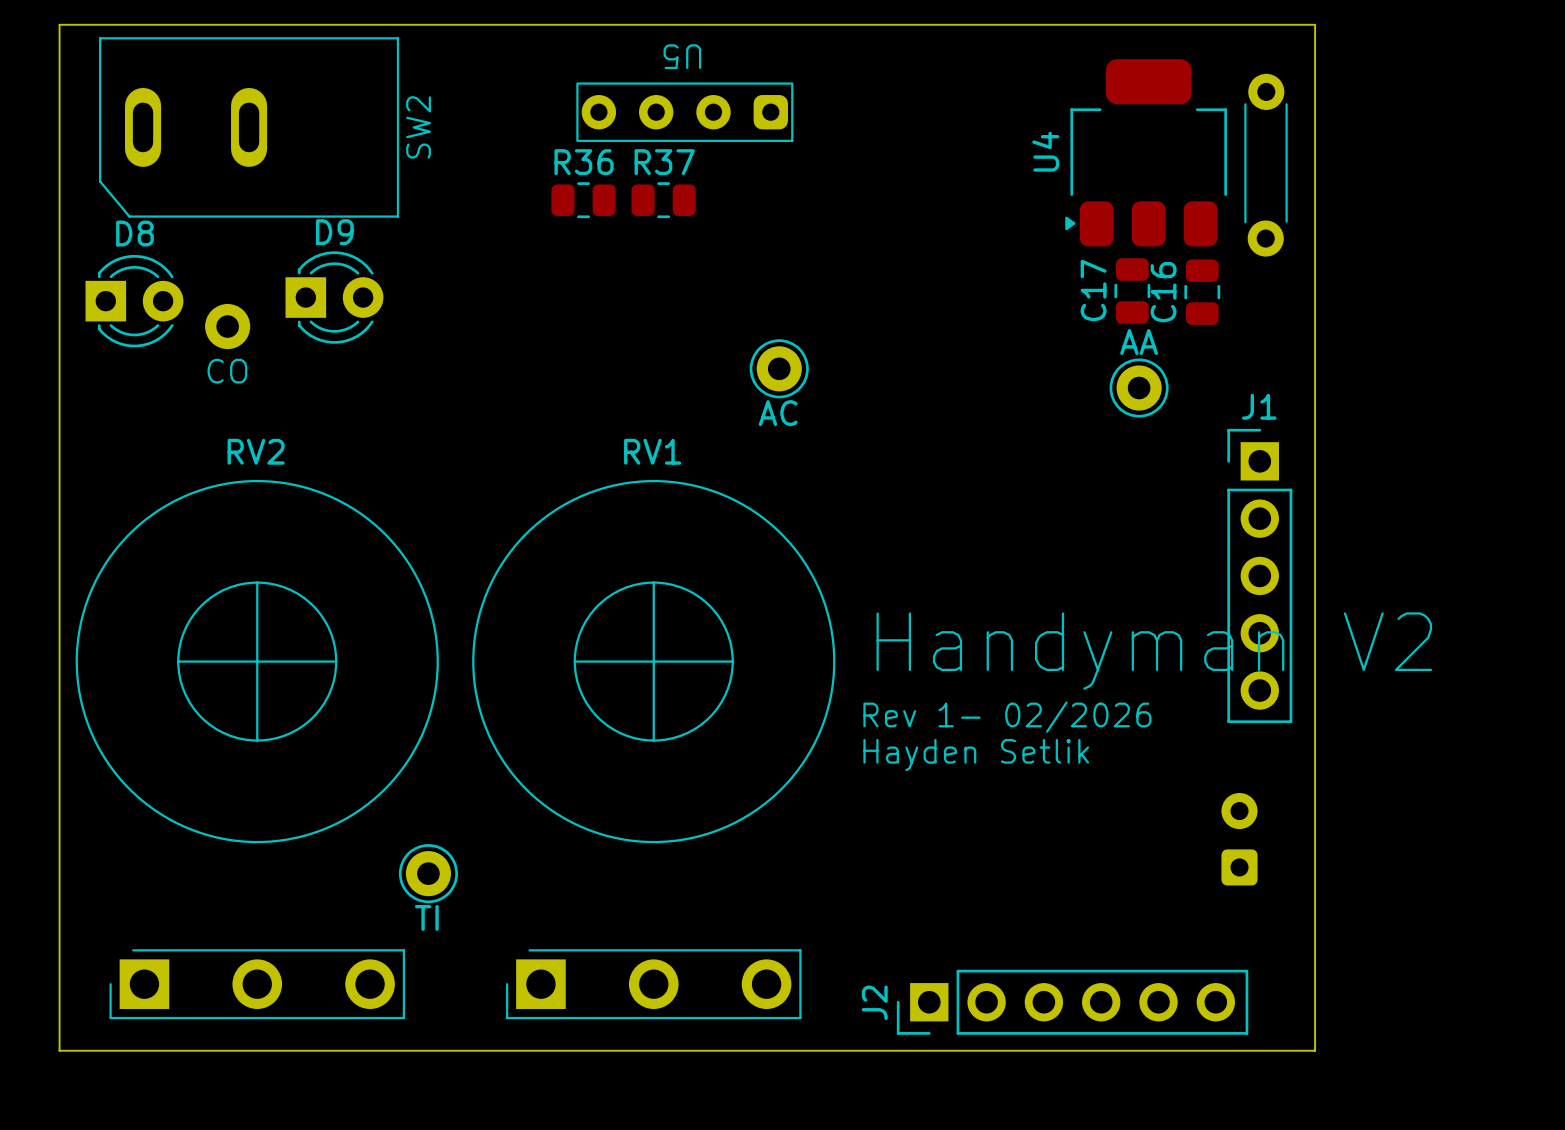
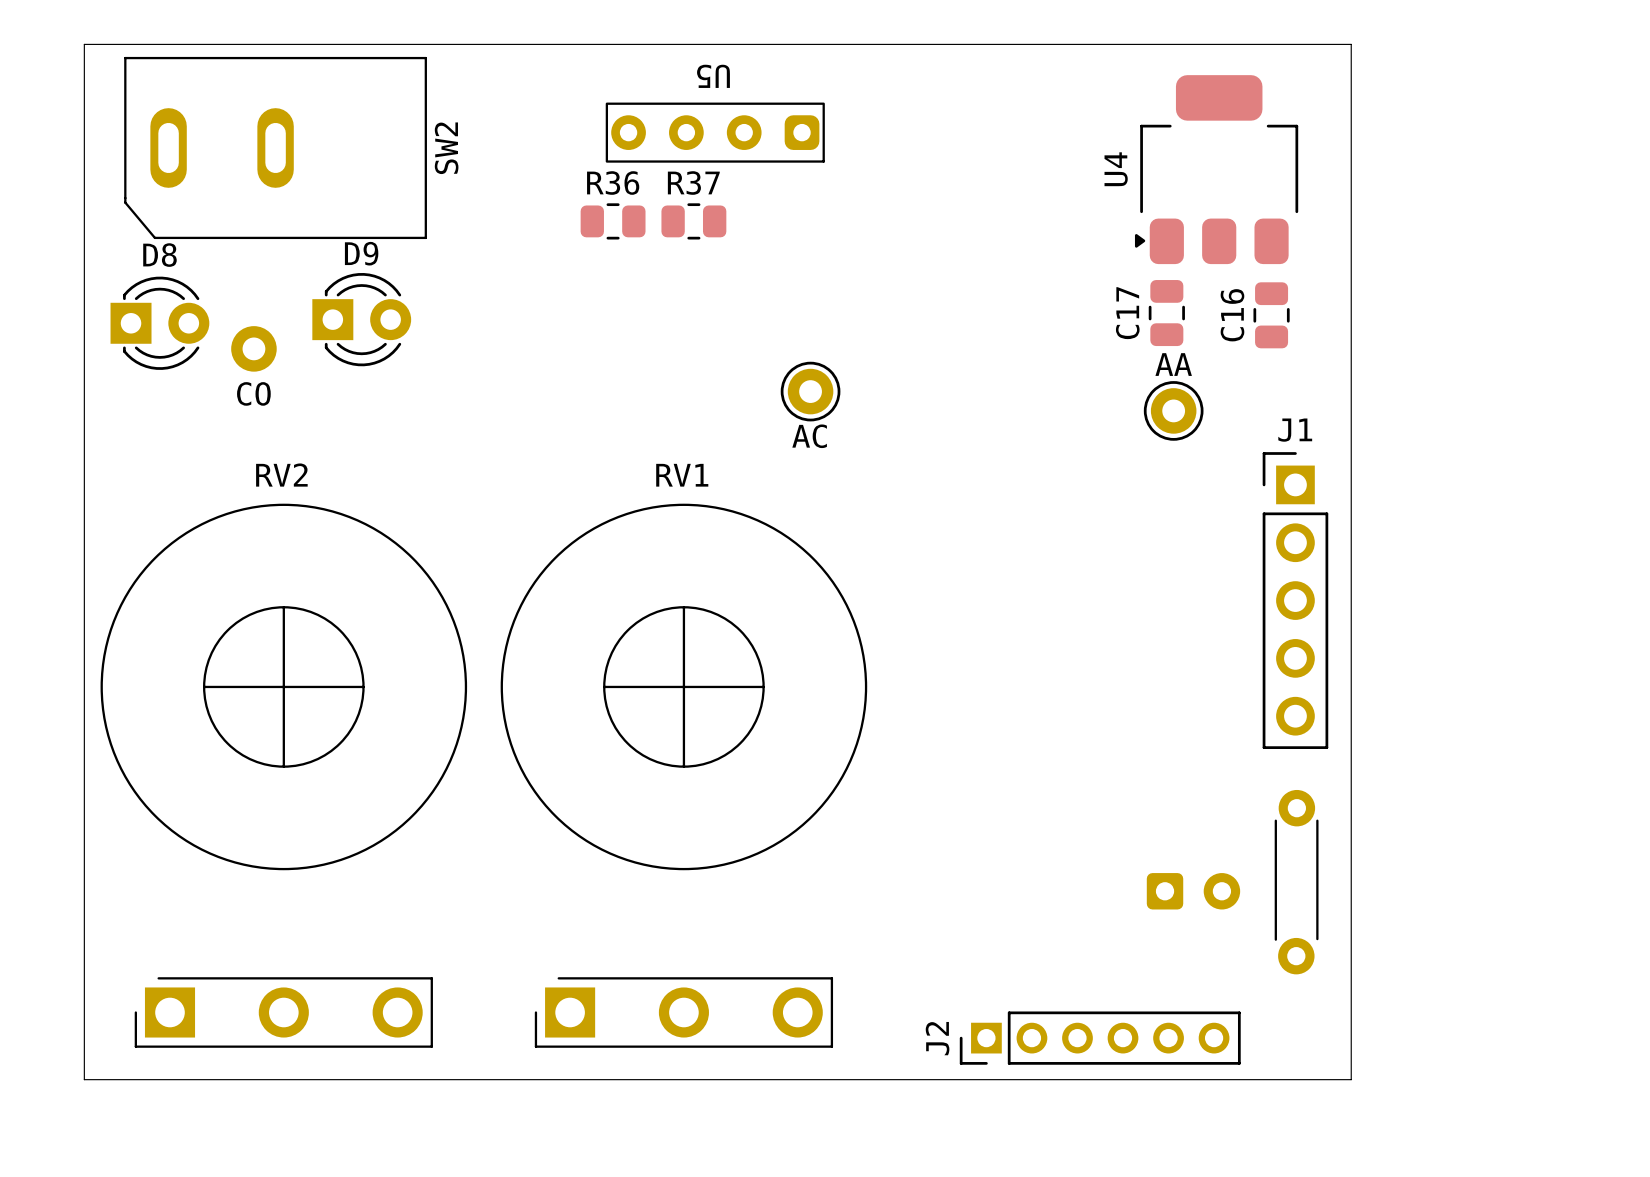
U4 position: (1146, 152) -> (1216, 169)
part: (1266, 165) -> none
C16 position: (1202, 292) -> (1271, 315)
text: Handyman V2 (1154, 651) -> none
text: Rev 1- 02/2026 (1007, 717) -> none
text: Hayden Setlik (976, 755) -> none
part rotation: 0° (1239, 839) -> 90° clockwise (1193, 891)
part position: (1239, 839) -> (1193, 891)
part: none -> (1296, 882)
part: TI (428, 873) -> none
J2 footprint: [896, 969, 1249, 1035] -> [959, 1011, 1241, 1065]

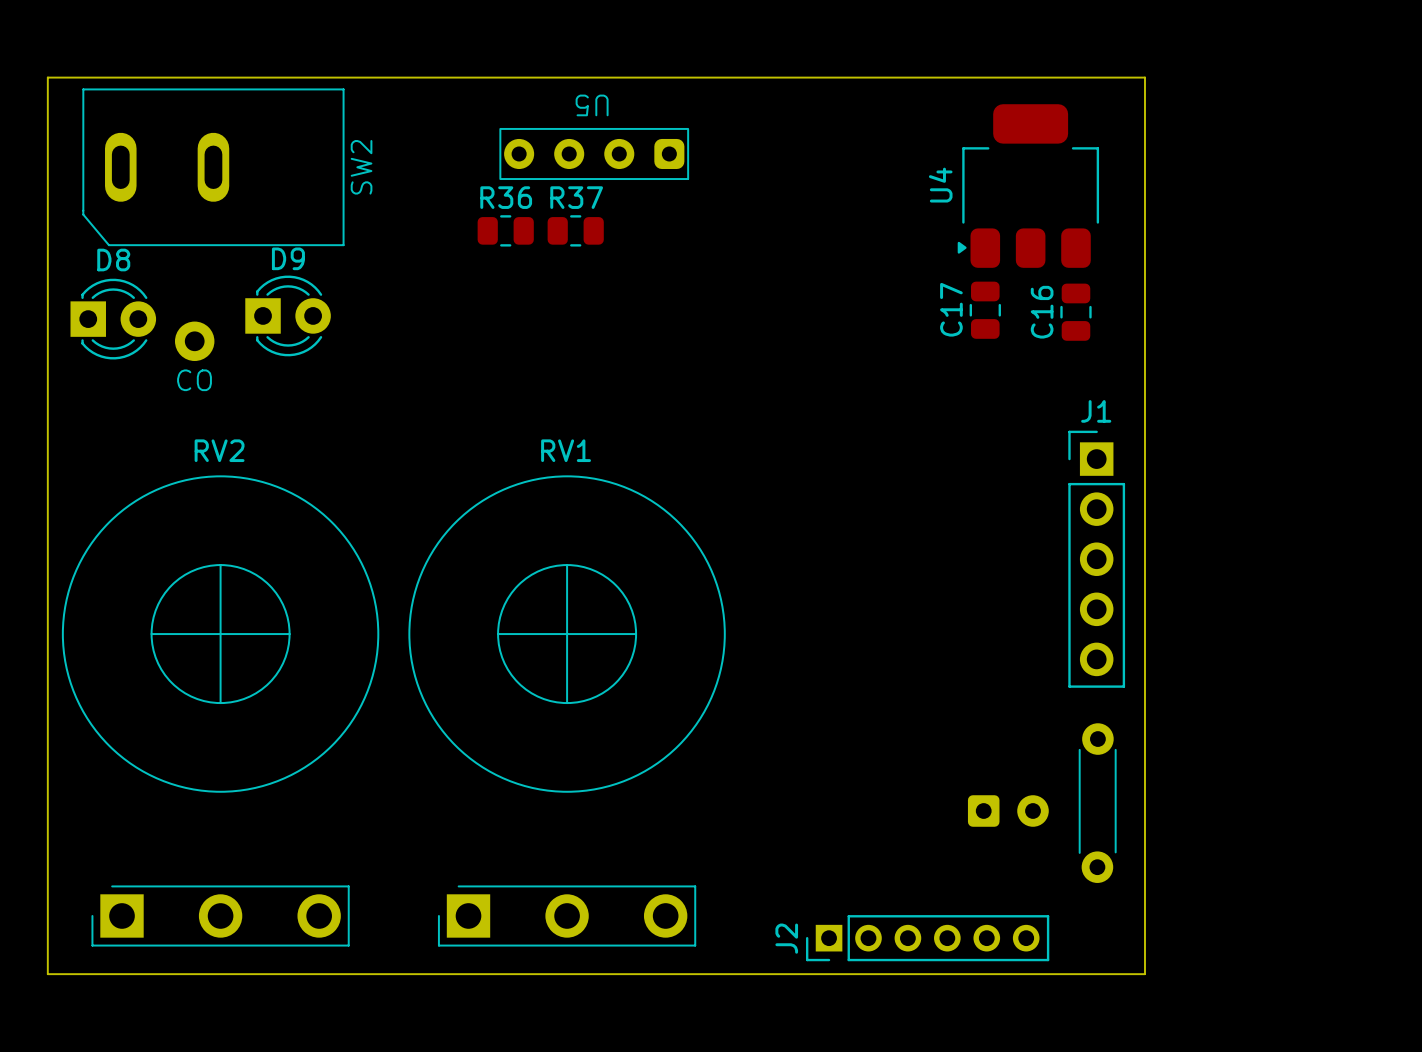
part: AC (810, 391) -> none
part: AA (1173, 410) -> none

